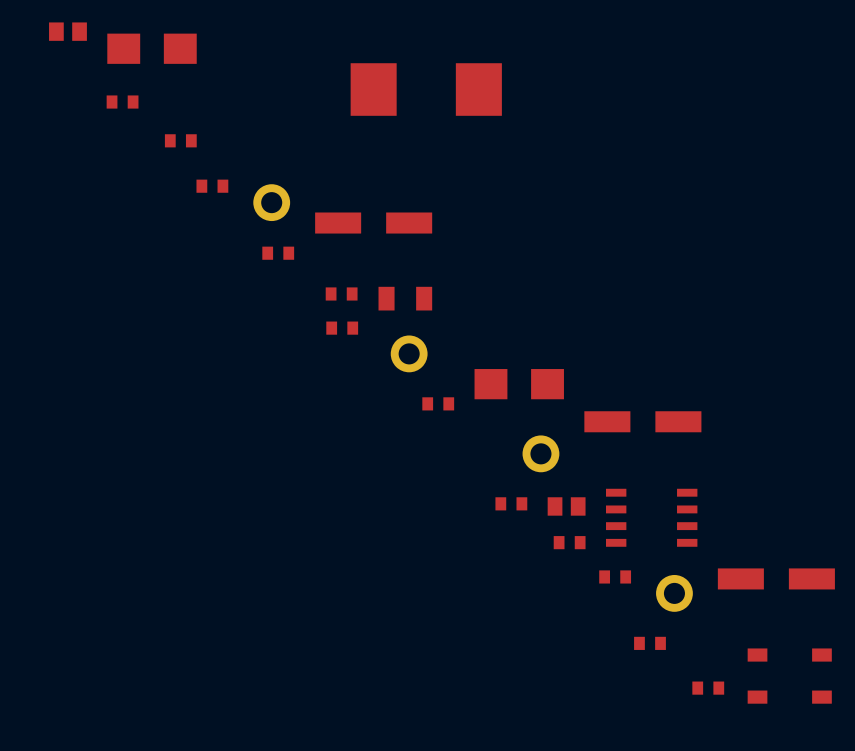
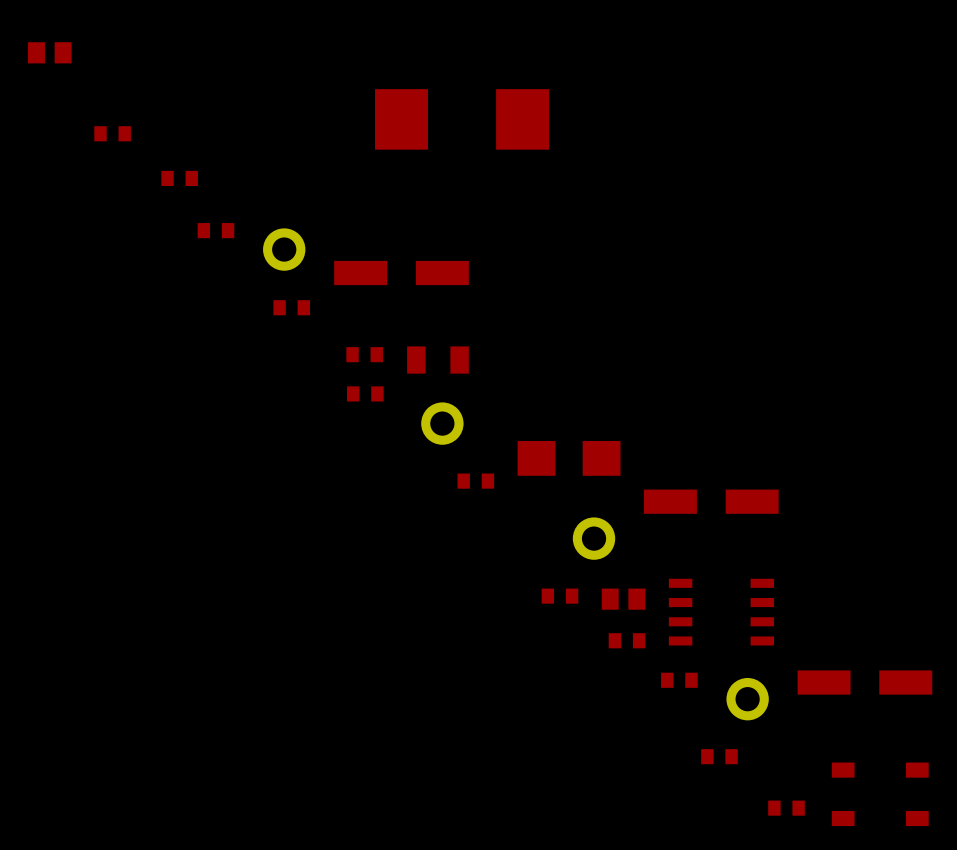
part: (152, 48) -> none

